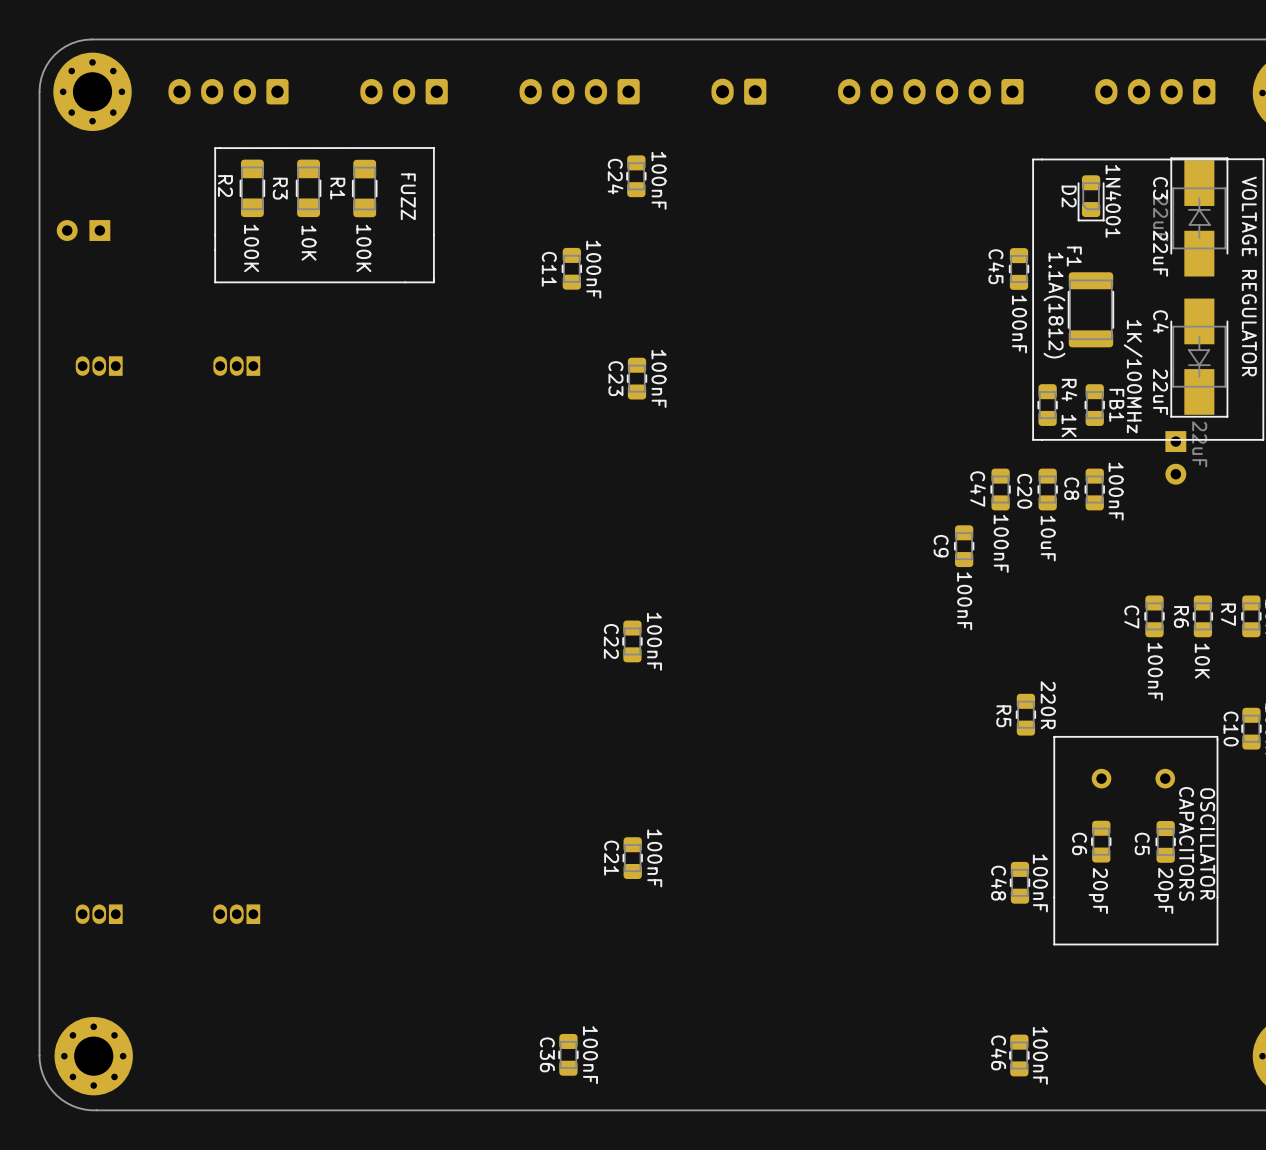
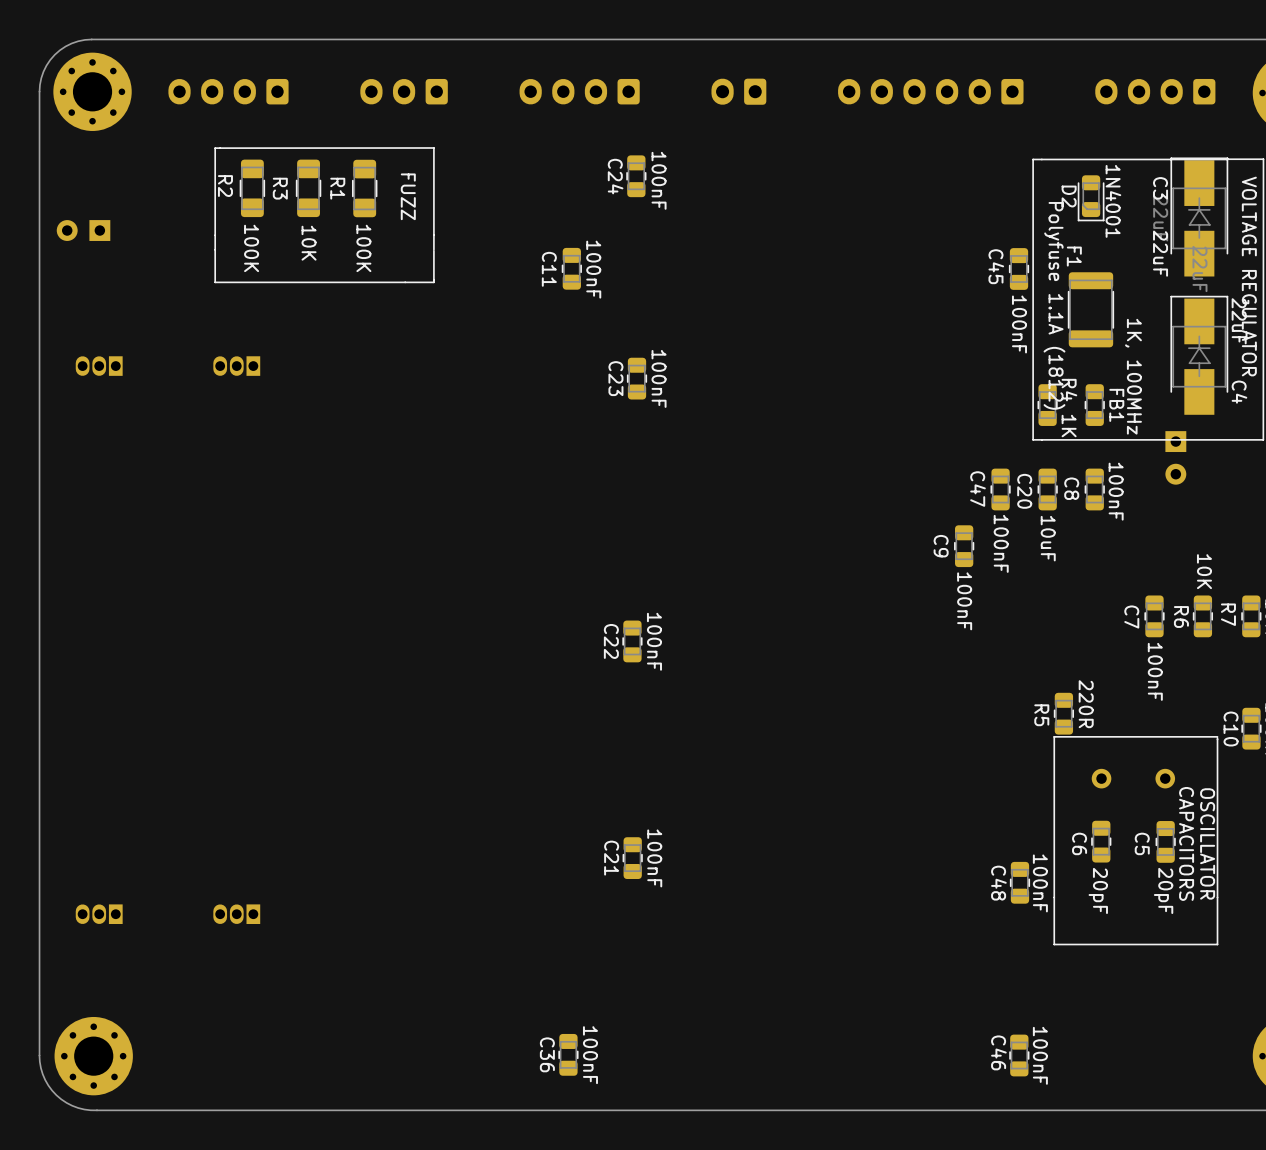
F1 value: 1.1A(1812) (1054, 305) -> Polyfuse 1.1A (1812) (1054, 305)
C4 rotation: 0° (1199, 358) -> 180° (1199, 355)
FB1 value: 1K/100MHz (1133, 376) -> 1K, 100MHz (1133, 376)
R6 value position: 10K (1202, 661) -> 10K (1204, 571)
R5 position: (1025, 714) -> (1063, 713)

